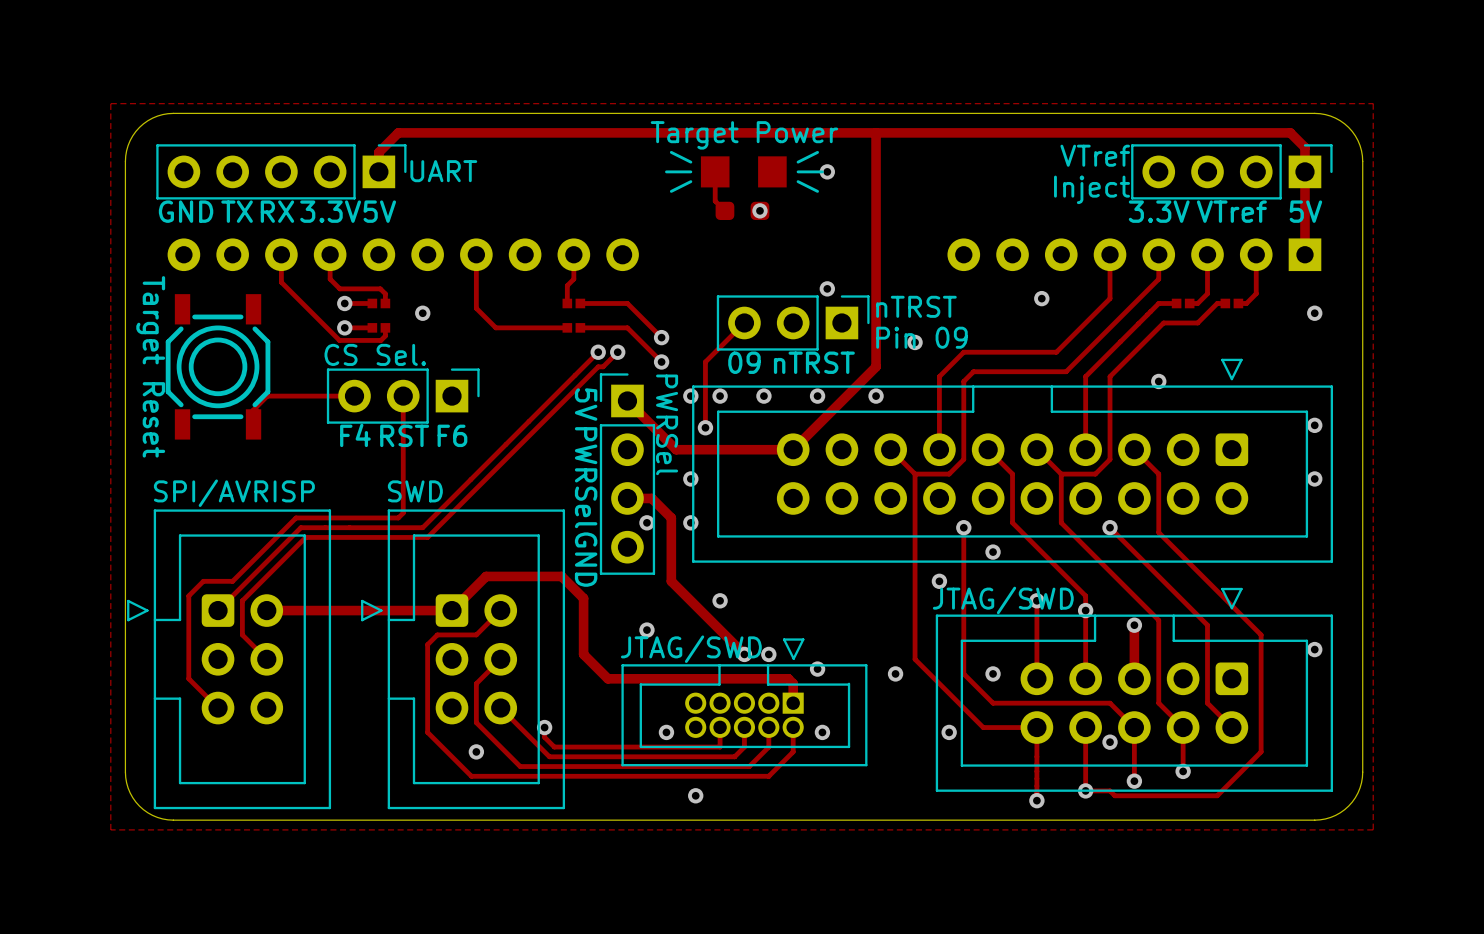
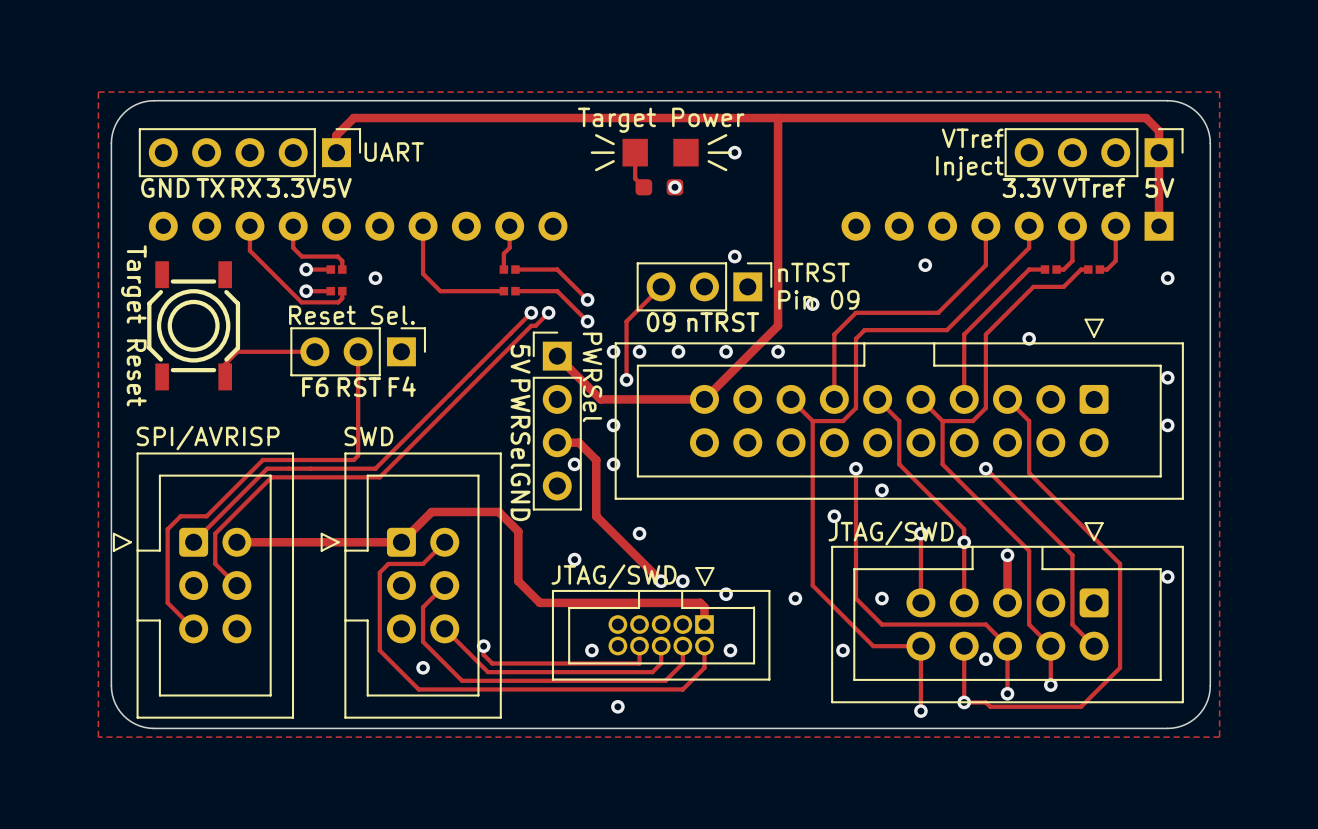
text: CS Sel. (375, 354) -> Reset Sel. (351, 315)
text: F4 (355, 435) -> F6 (315, 387)
text: F6 (452, 435) -> F4 (402, 386)

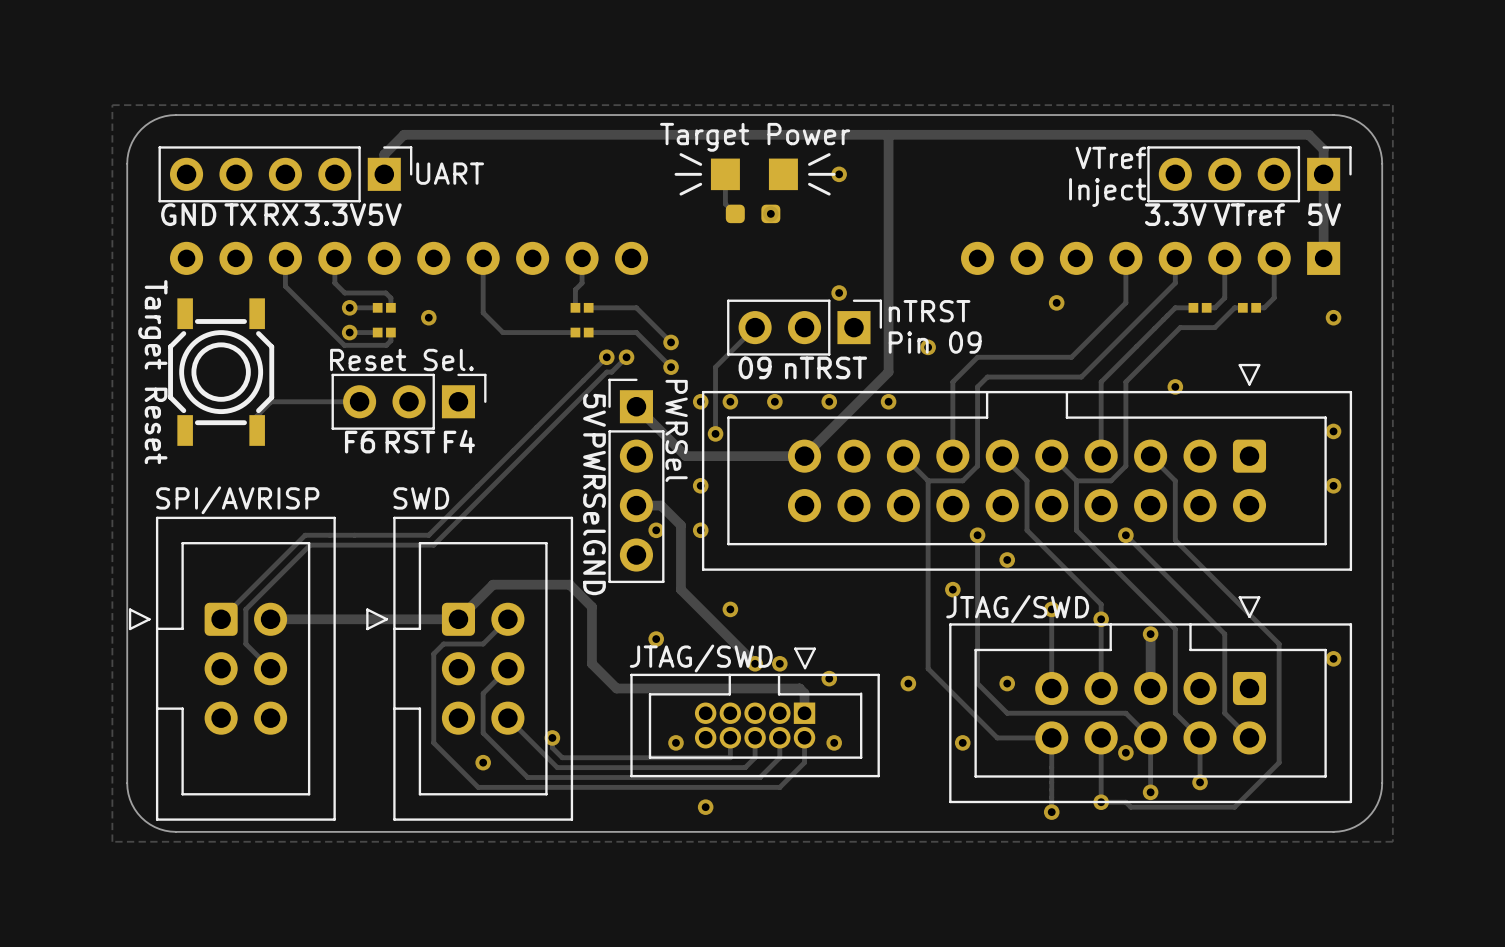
track: (358, 351) (358, 455) (353, 460) (262, 460) (206, 516) (180, 516) (167, 529) (167, 602) (193, 628) -> none

